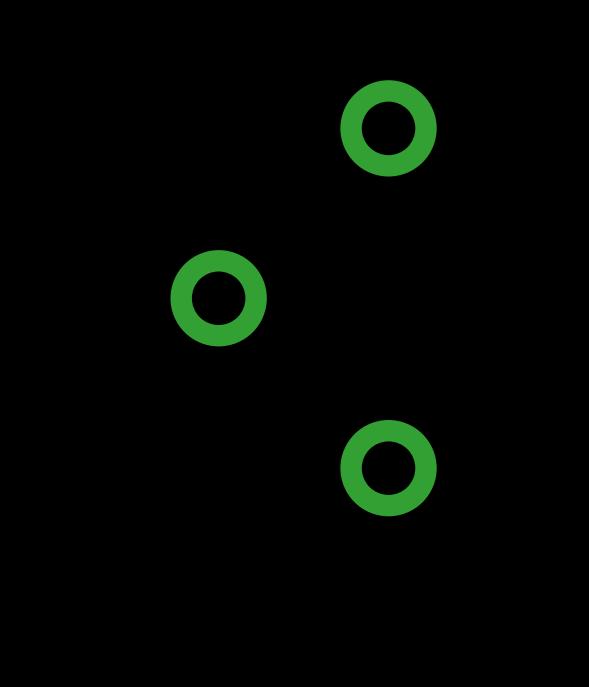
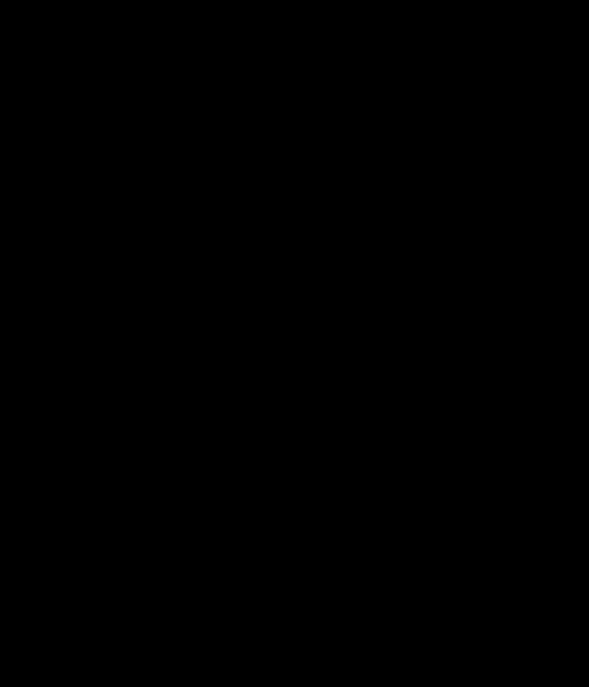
part: (303, 298) -> none

